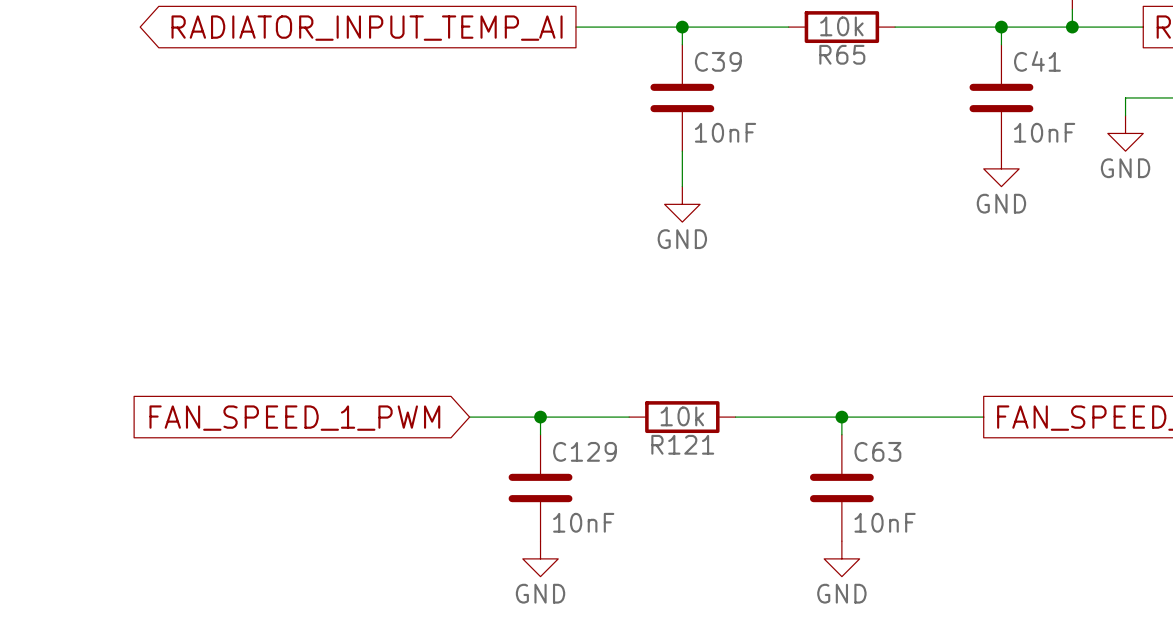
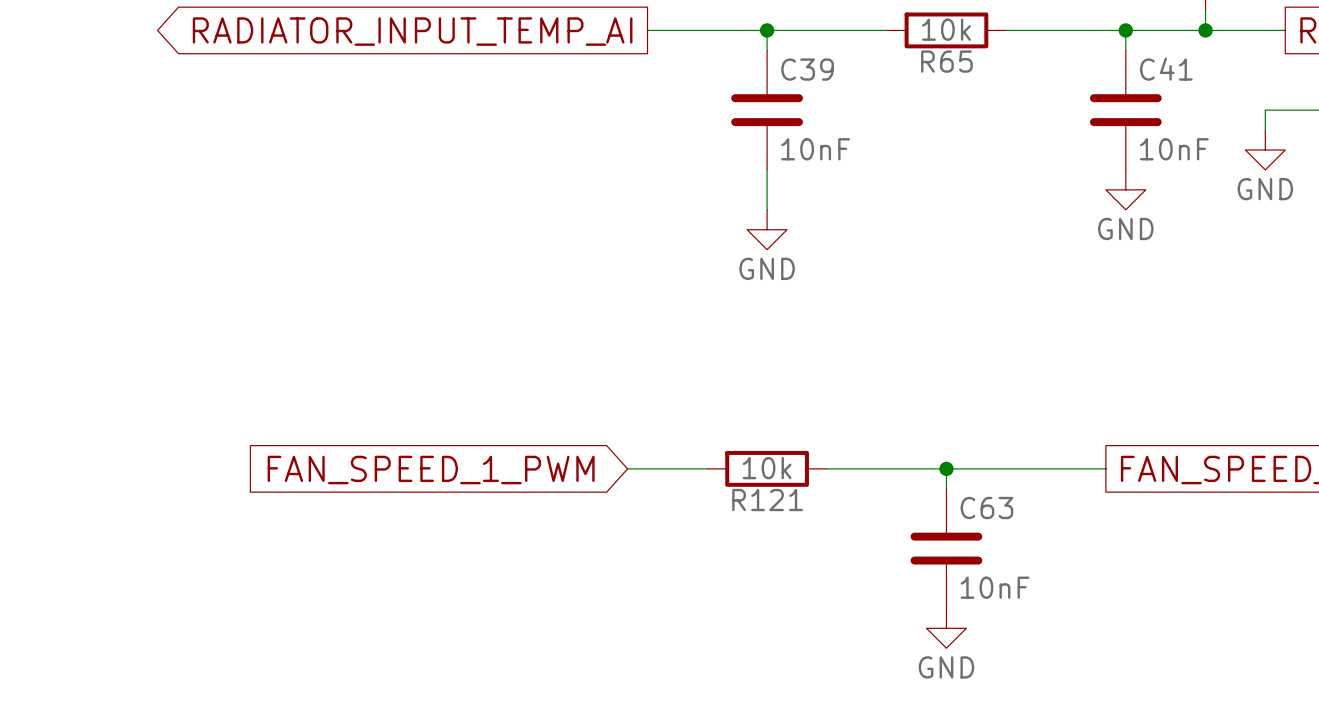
wire: (469, 417) (558, 417) -> none
wire: (540, 417) (540, 434) -> none
junction: (540, 417) -> none
global label position: FAN_SPEED_1_PWM (294, 418) -> FAN_SPEED_1_PWM (431, 470)
C129: 10nF (540, 487) -> none
power symbol: GND (540, 558) -> none

